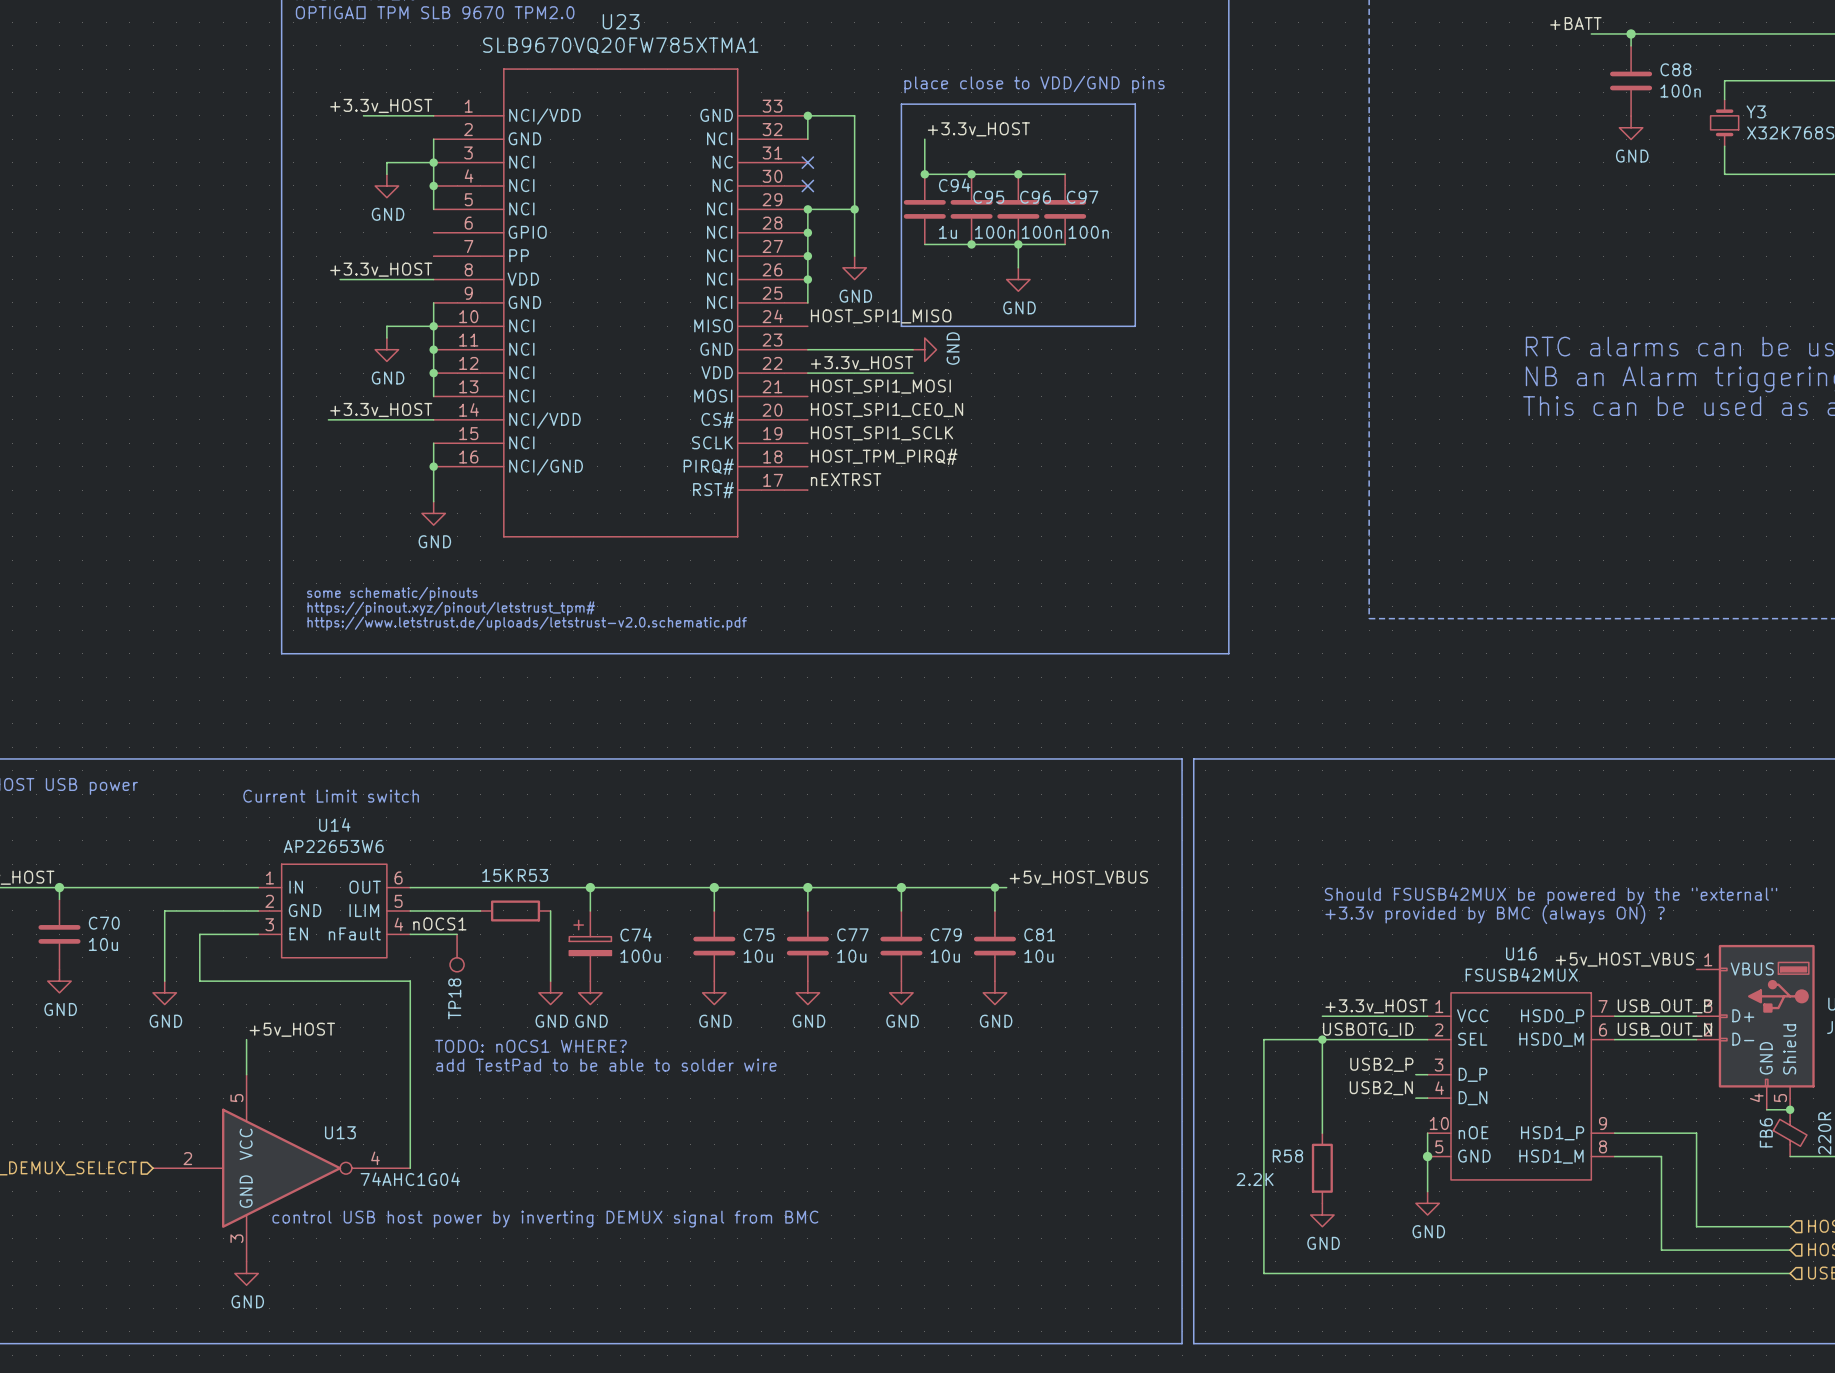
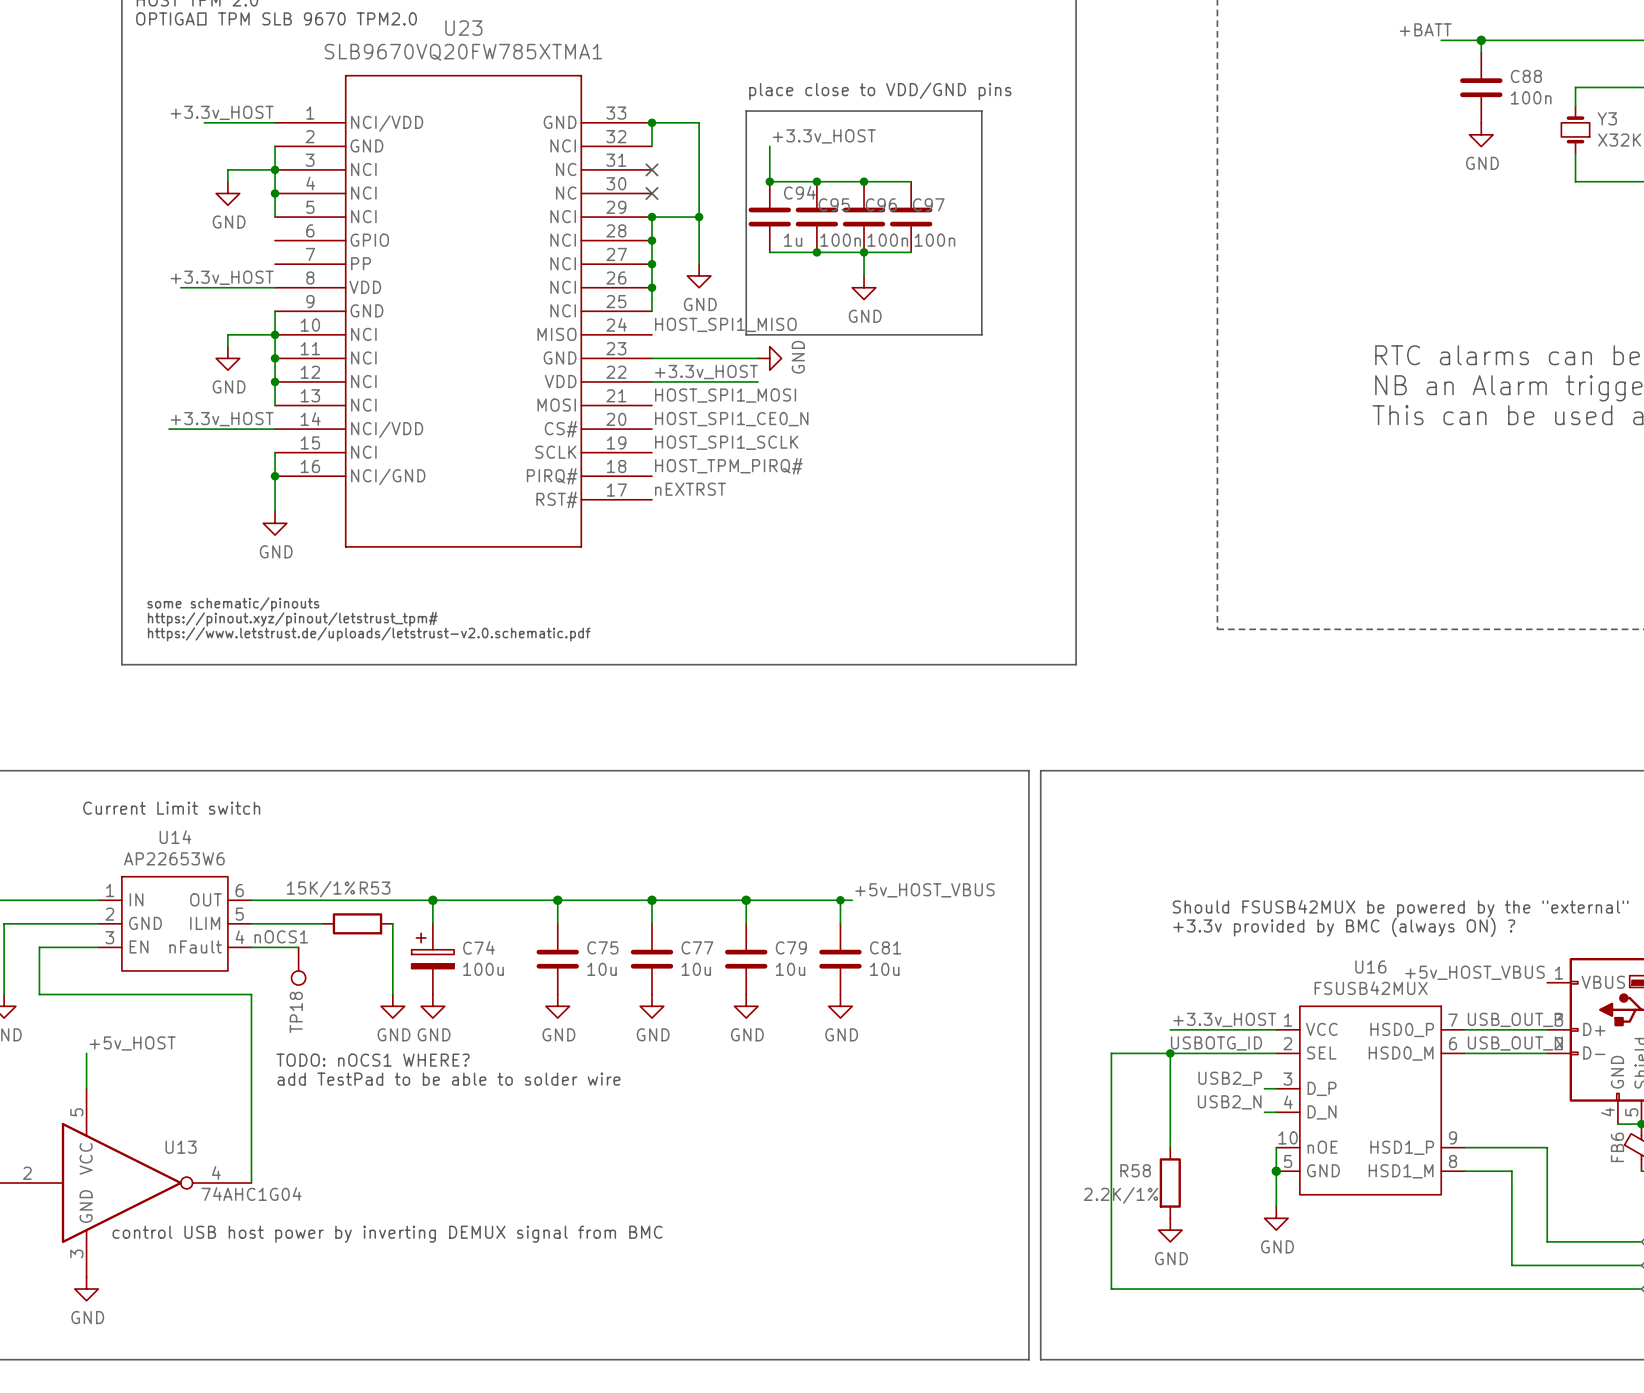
R53 value: 15K (497, 875) -> 15K/1% (320, 889)
R58 value: 2.2K (1255, 1179) -> 2.2K/1% (1121, 1195)

